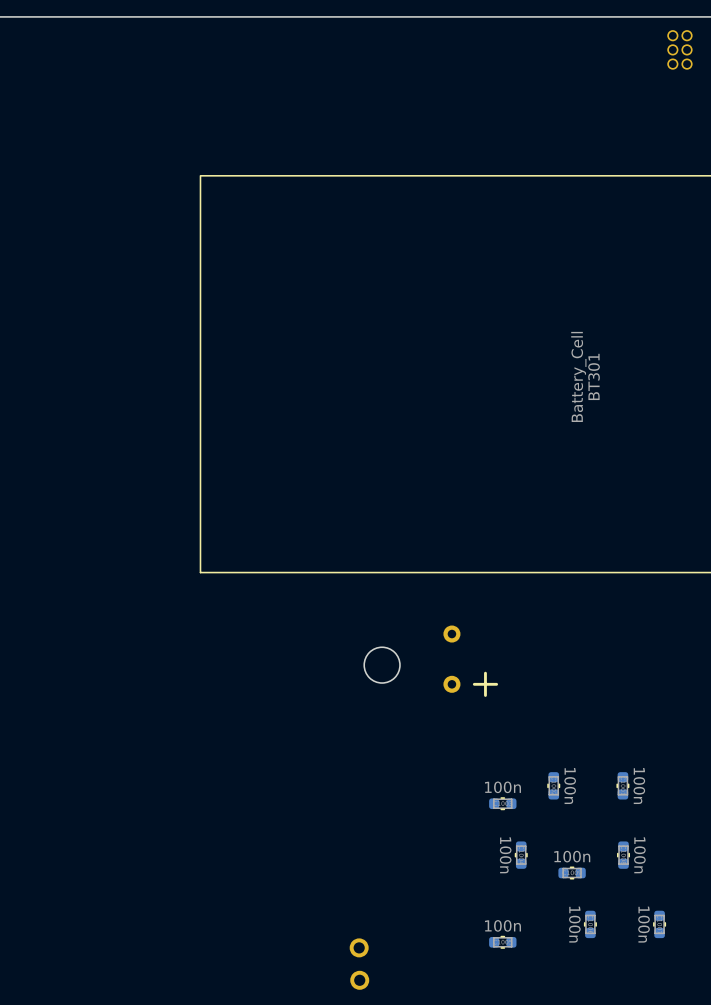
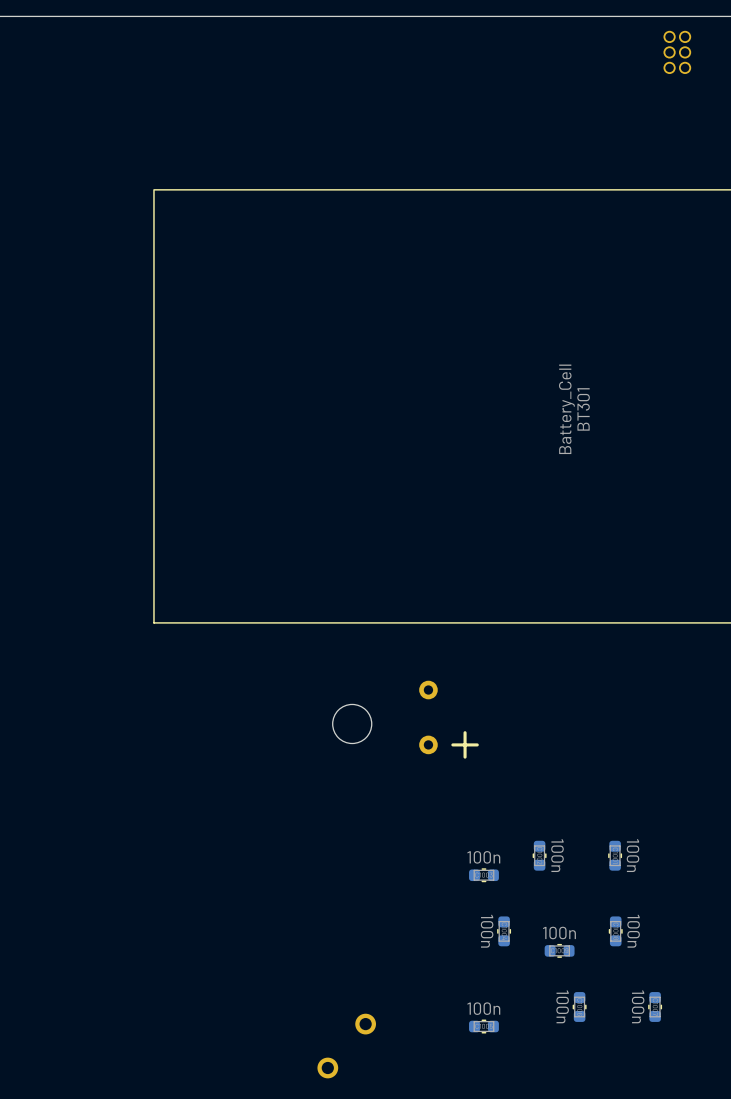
part position: (359, 947) -> (365, 1024)

